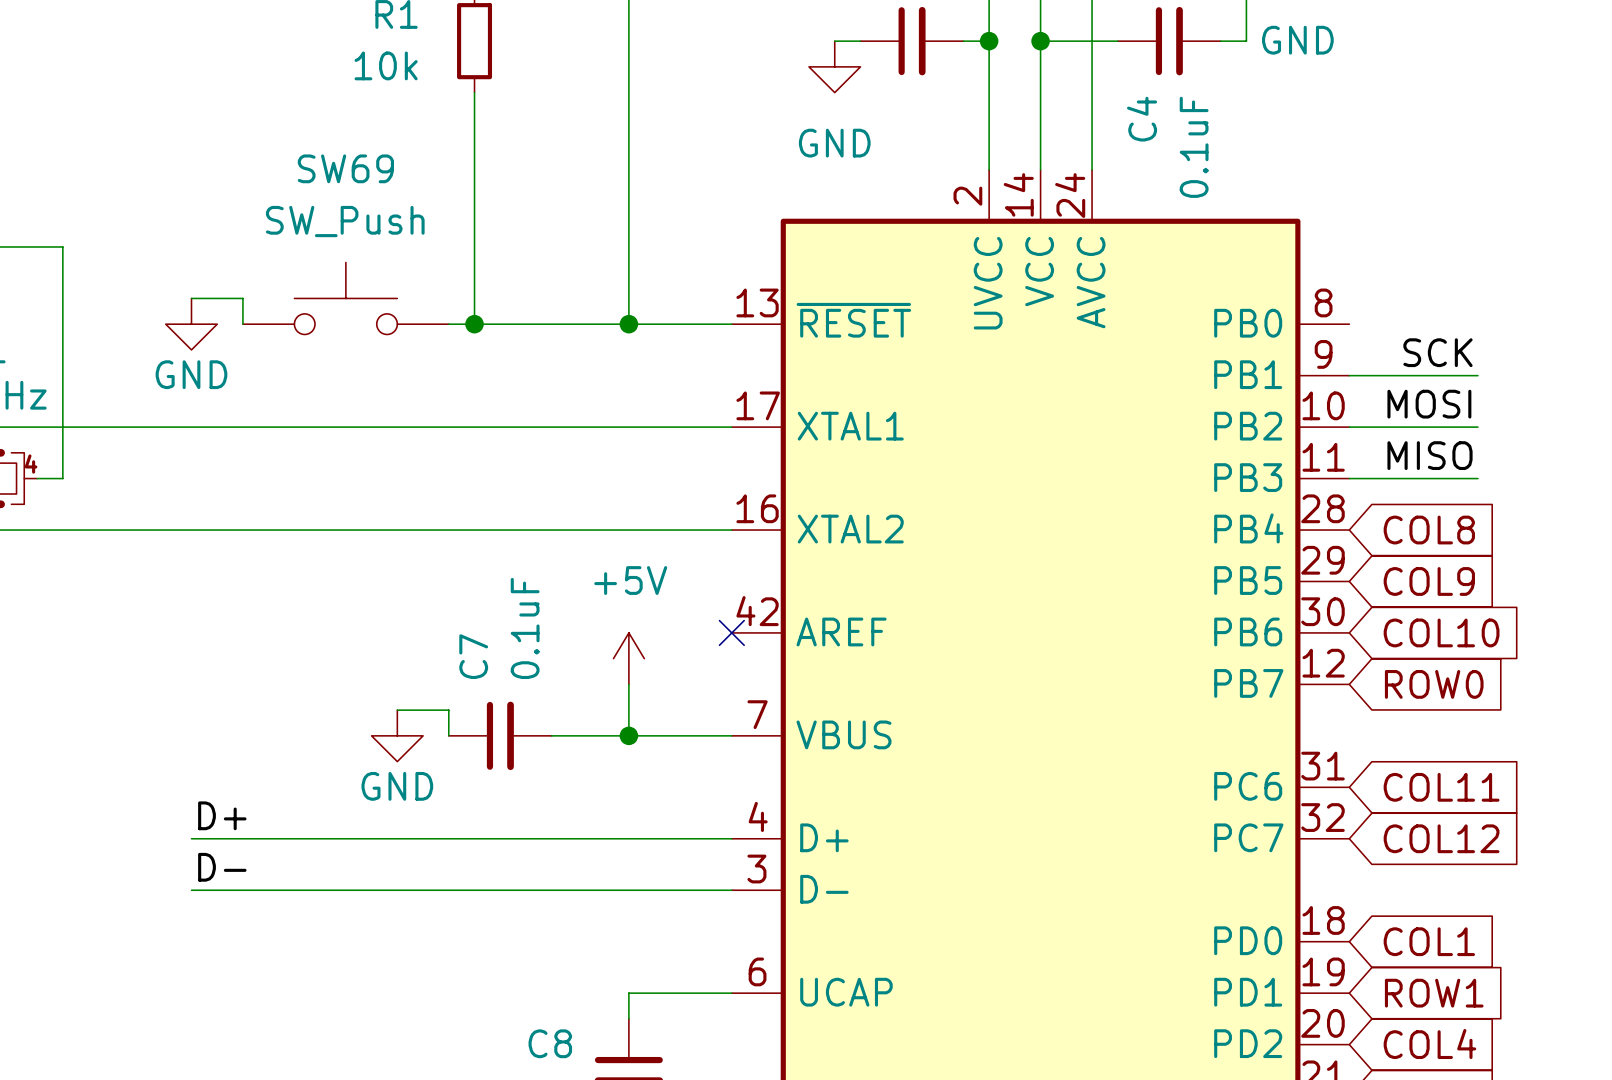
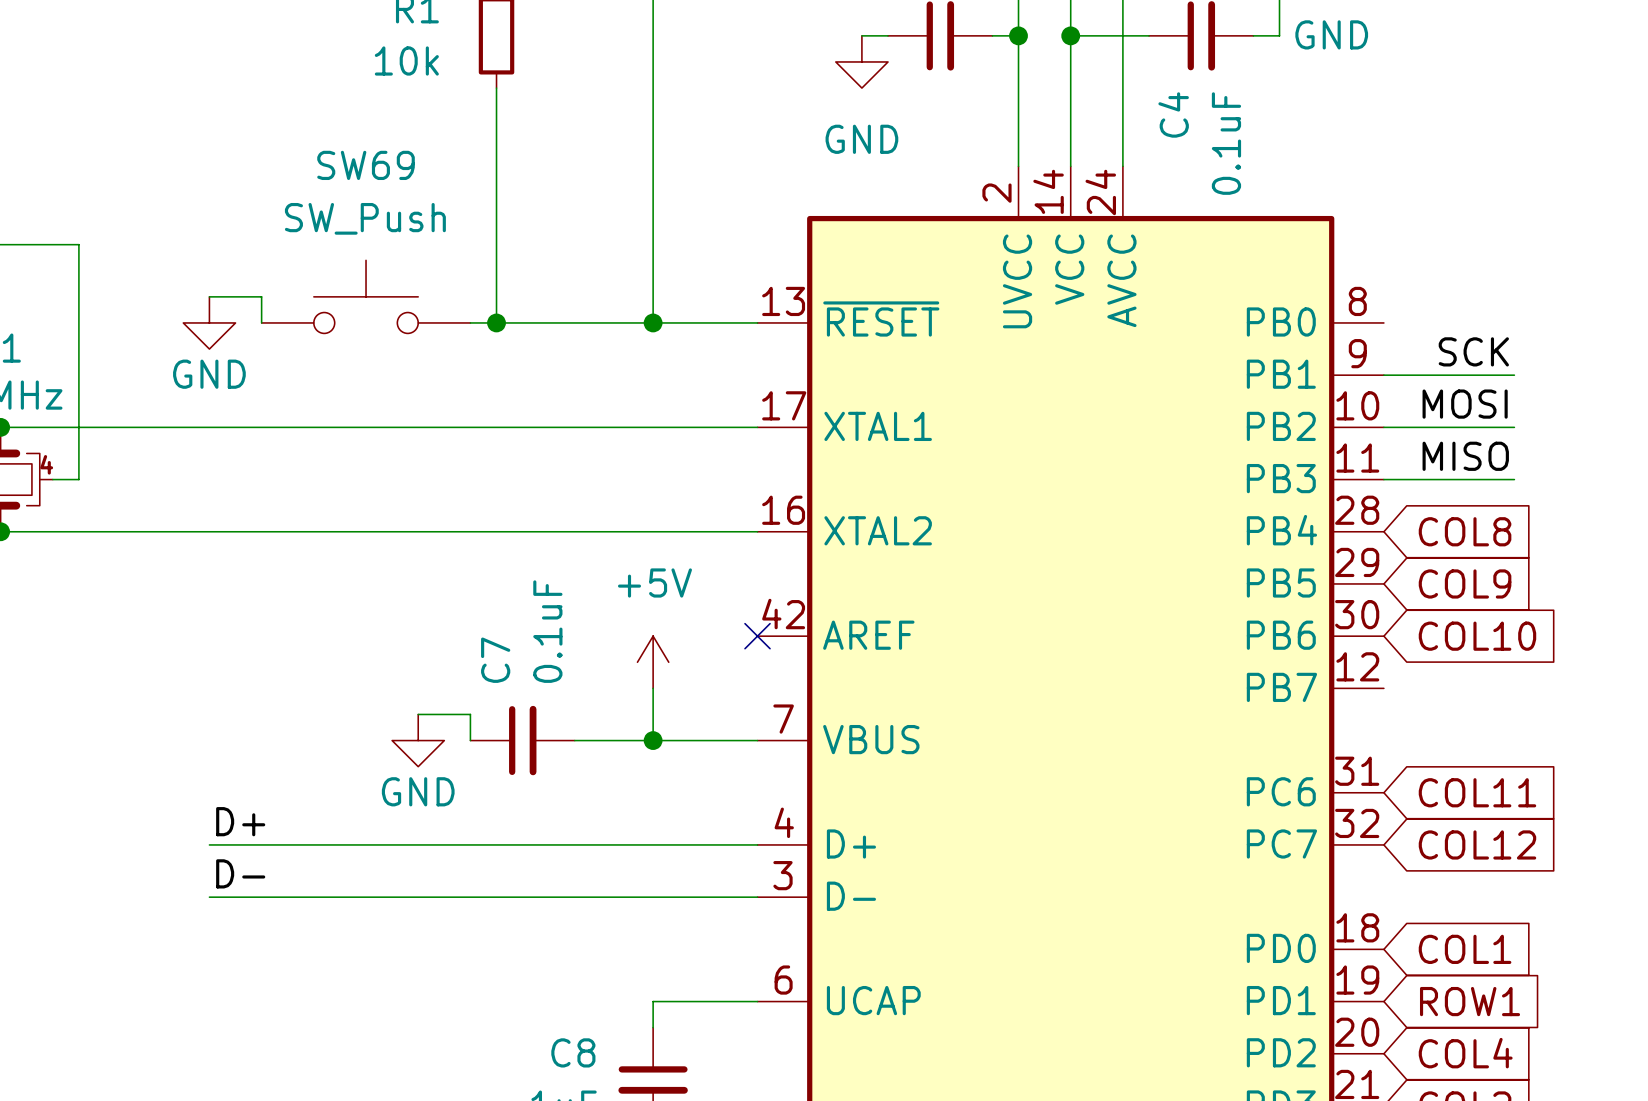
global label: ROW0 (1434, 684) -> none

